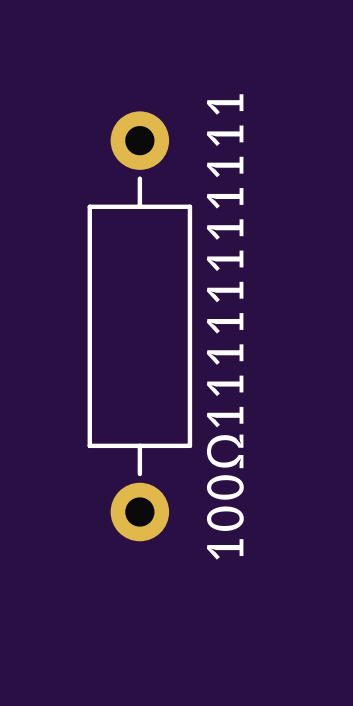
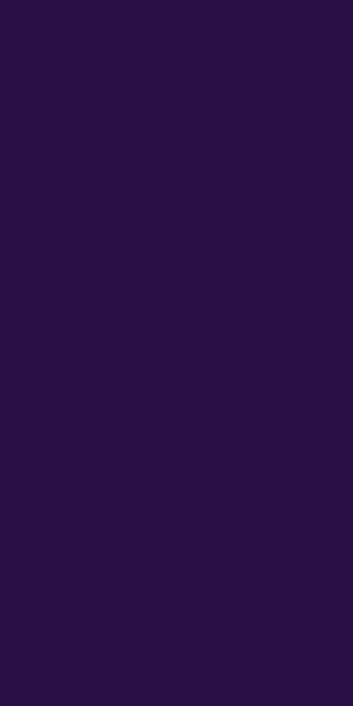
100Ω11111111111: (139, 326) -> none

